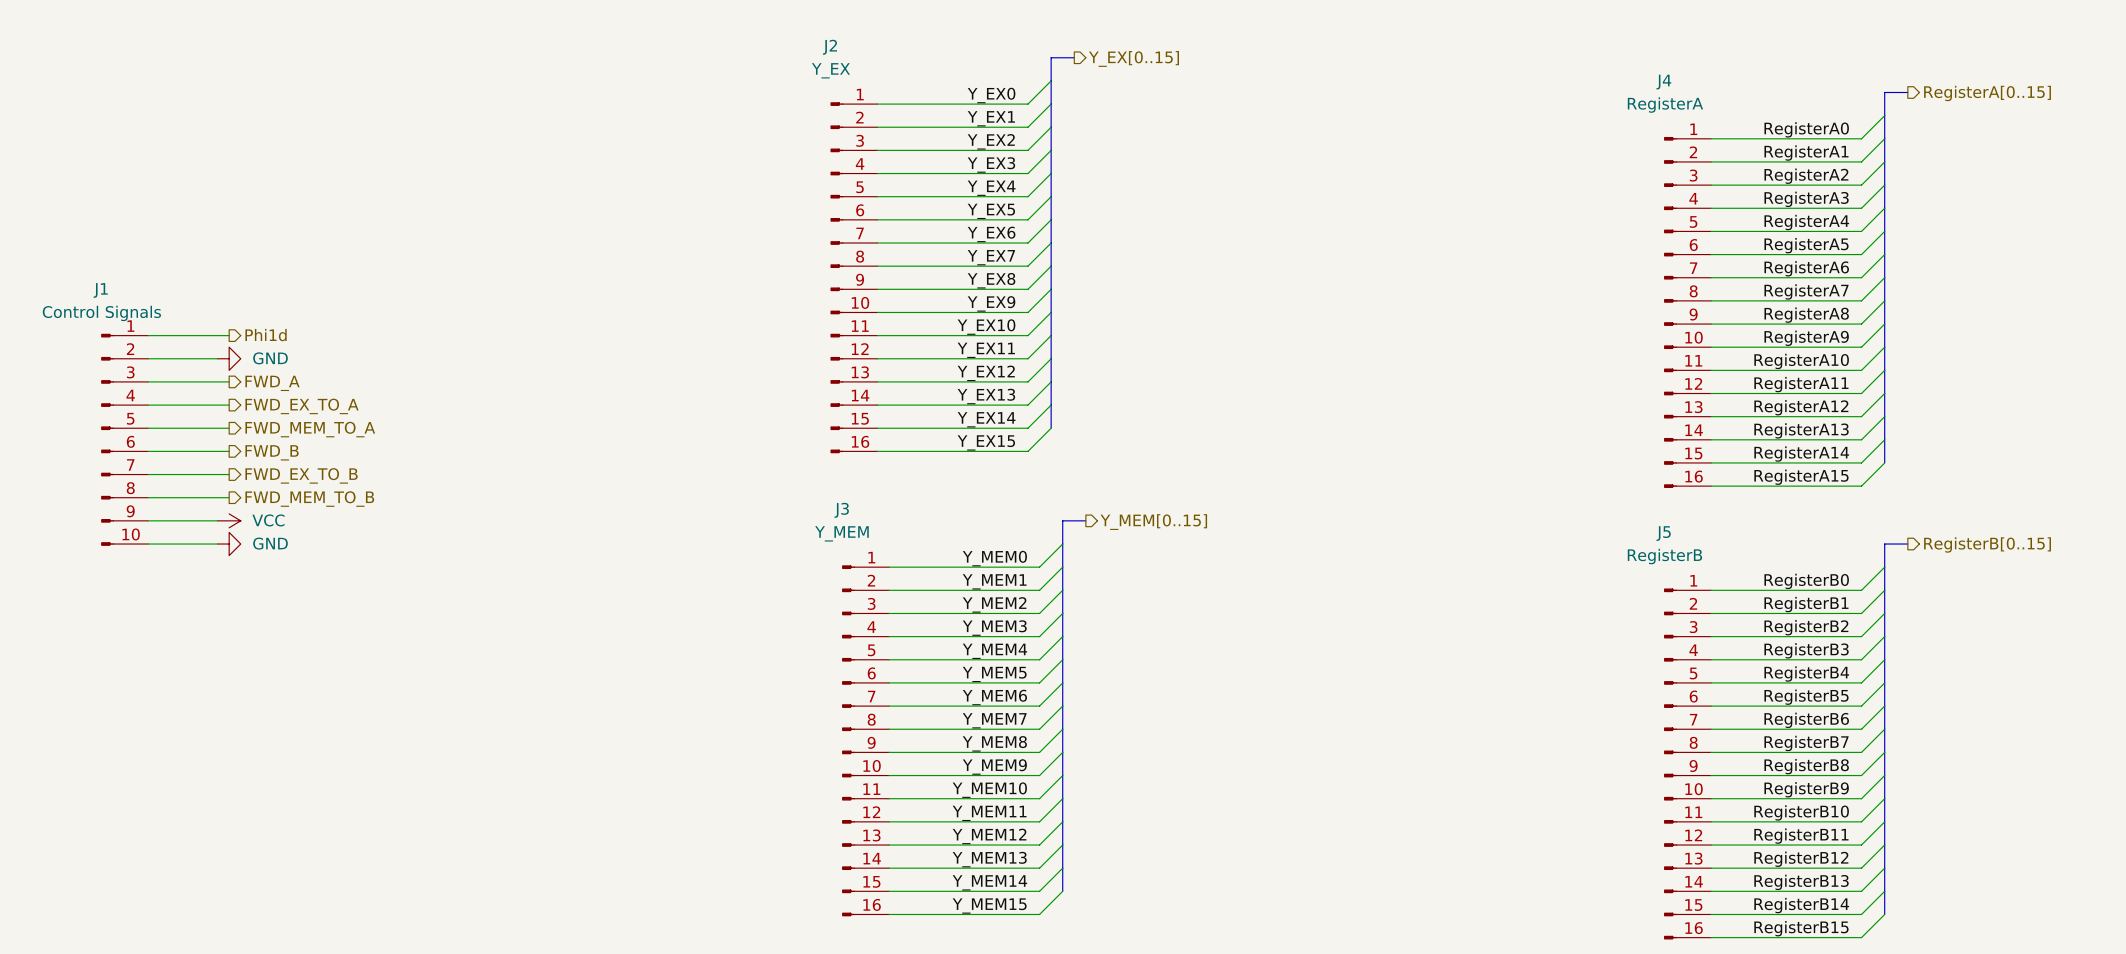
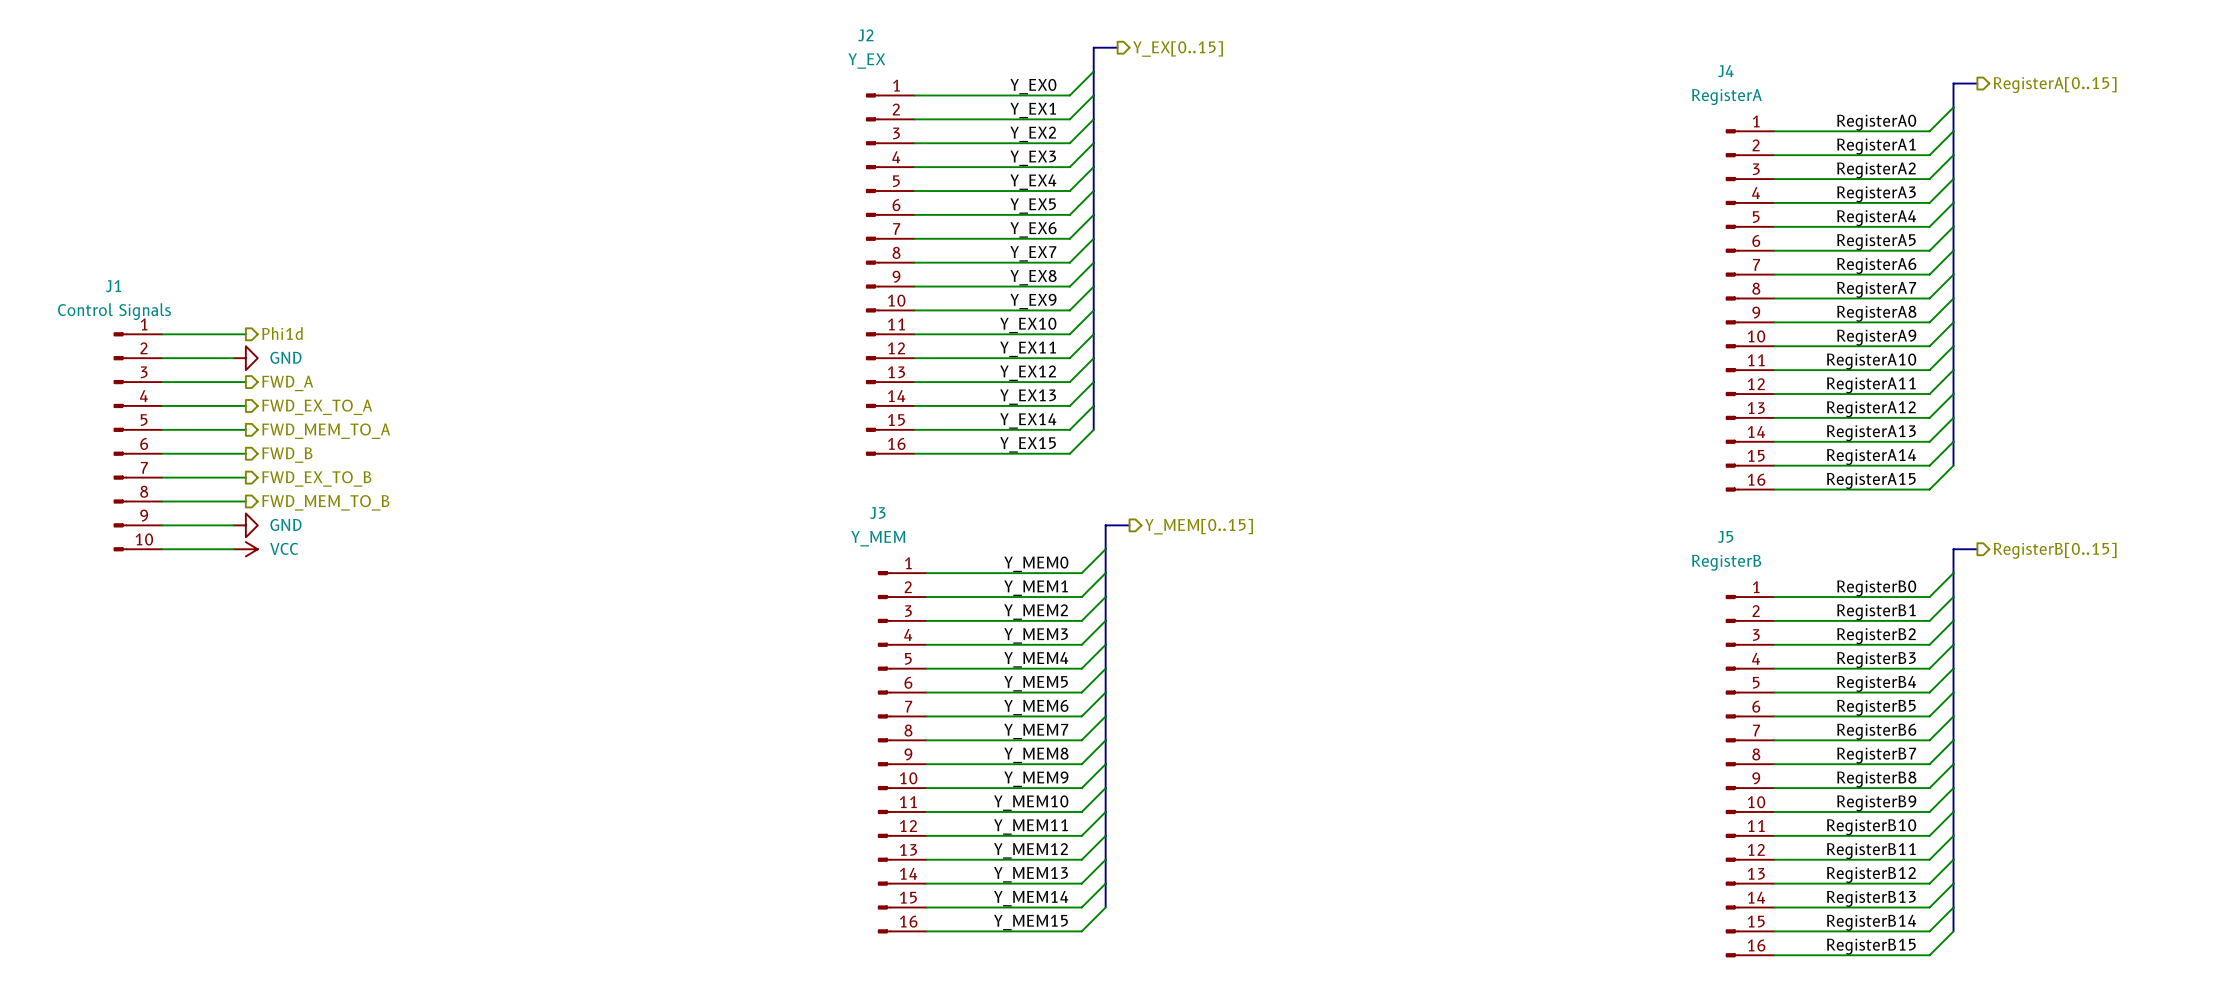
power symbol: VCC (229, 520) -> GND (245, 525)
power symbol: GND (229, 544) -> VCC (245, 549)

